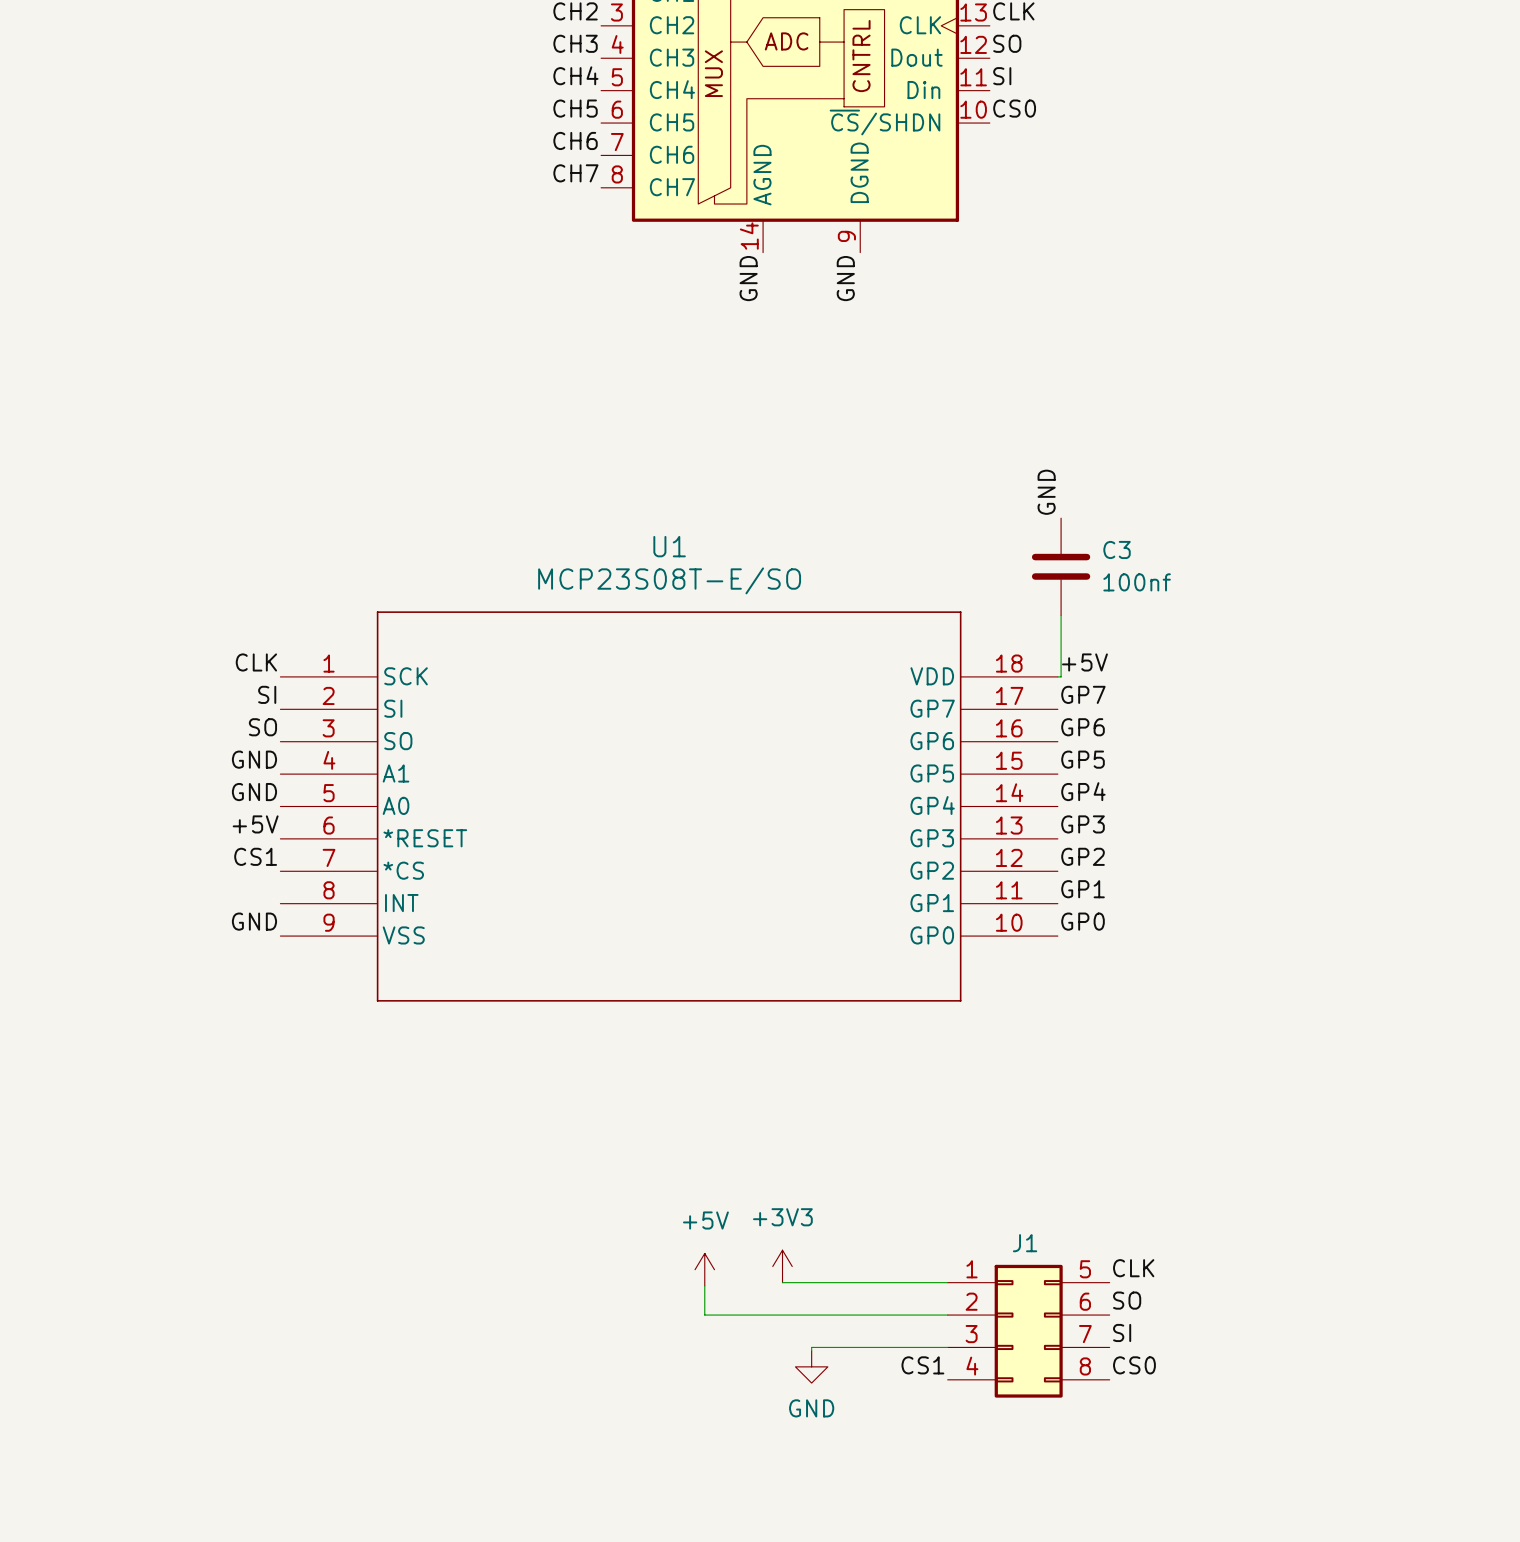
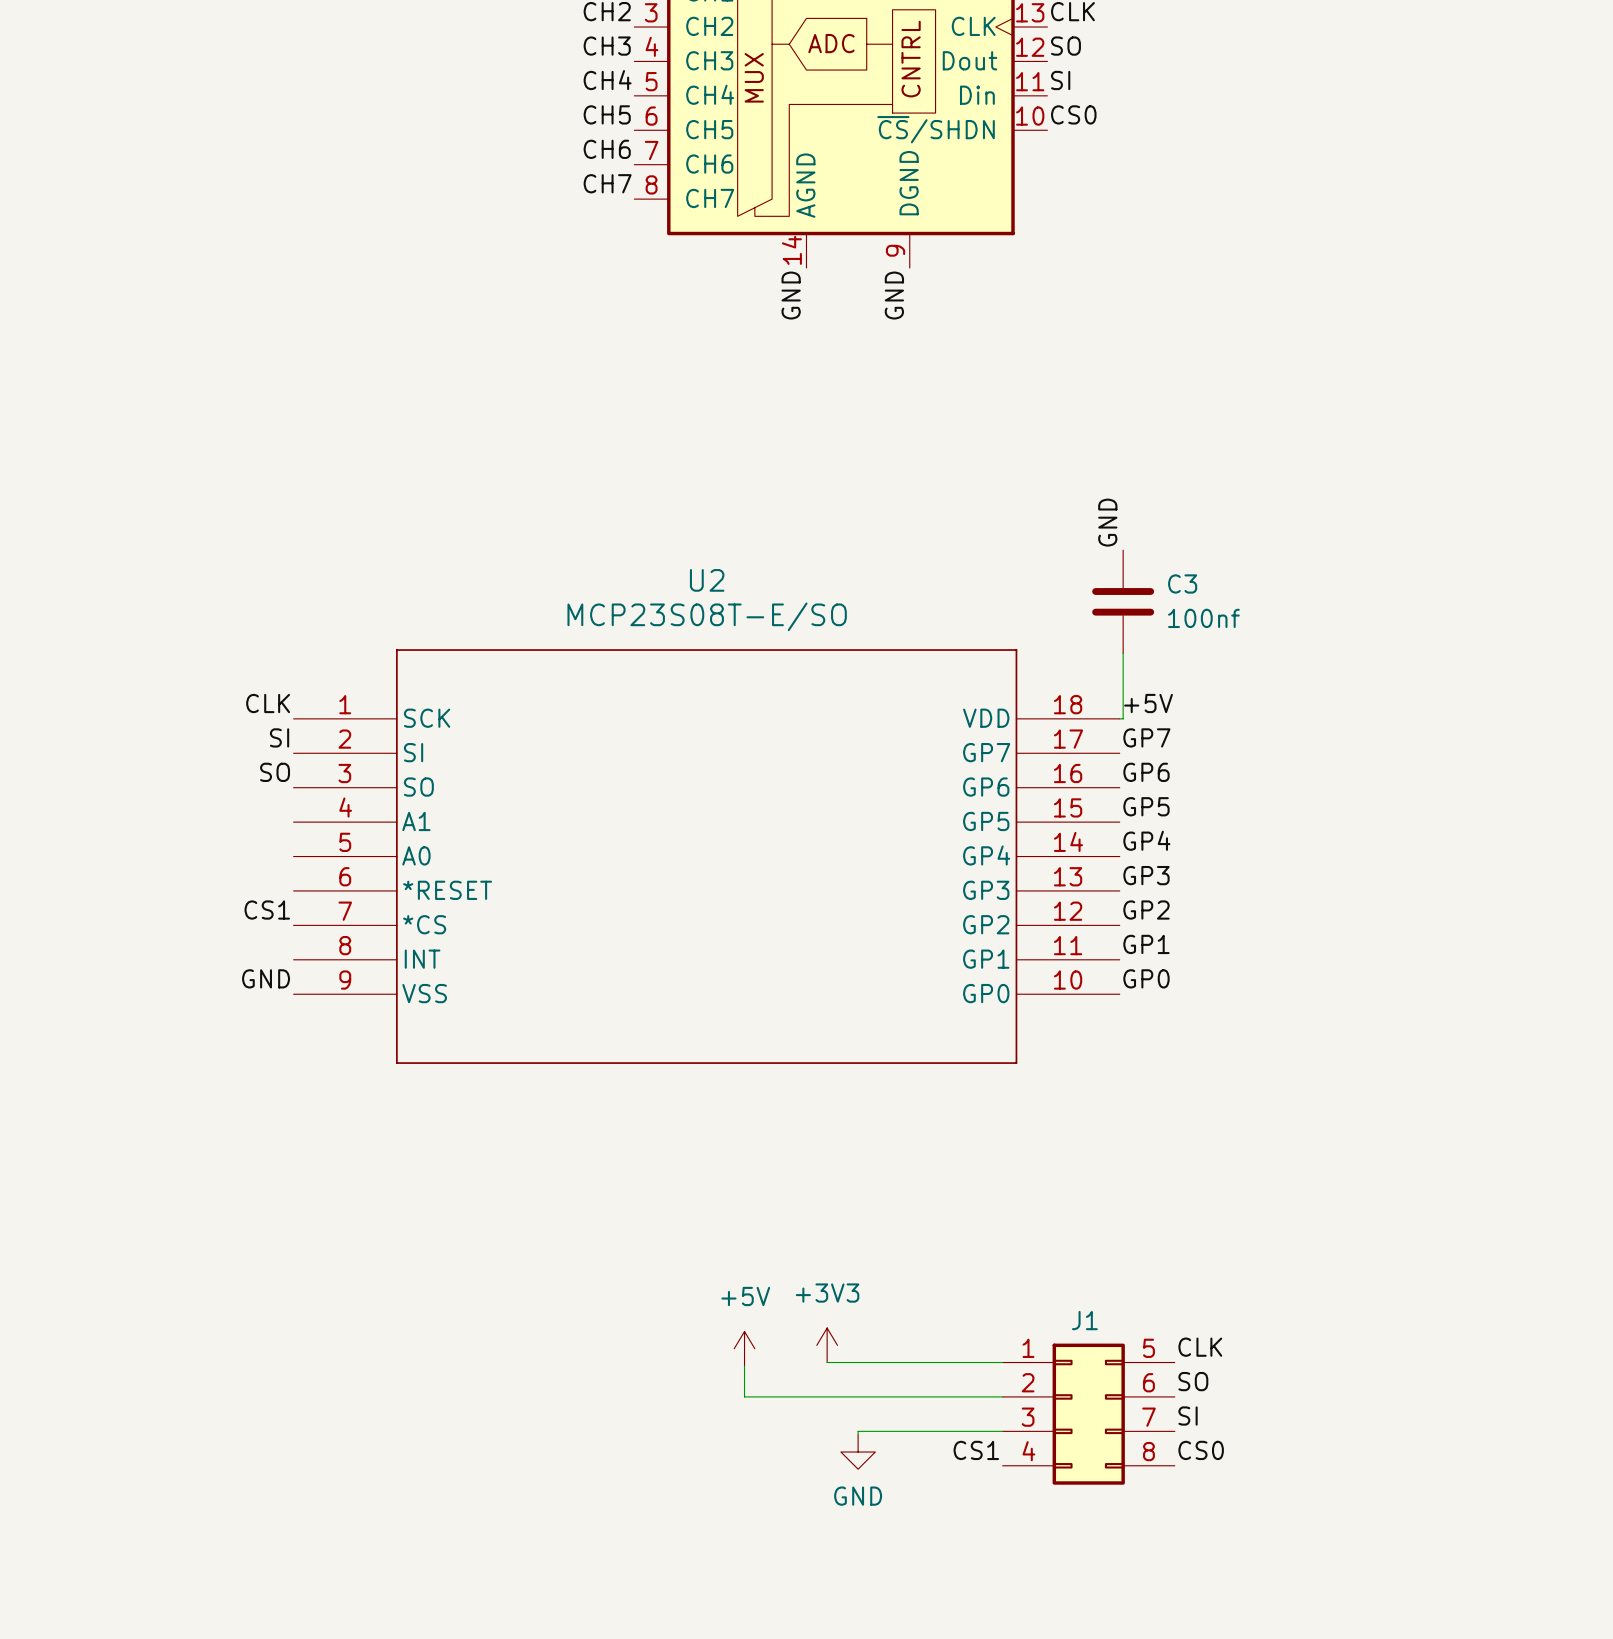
U1 name: U1 (669, 546) -> U2 (707, 580)
label: GND (254, 759) -> none
label: GND (254, 792) -> none
label: +5V (255, 824) -> none

